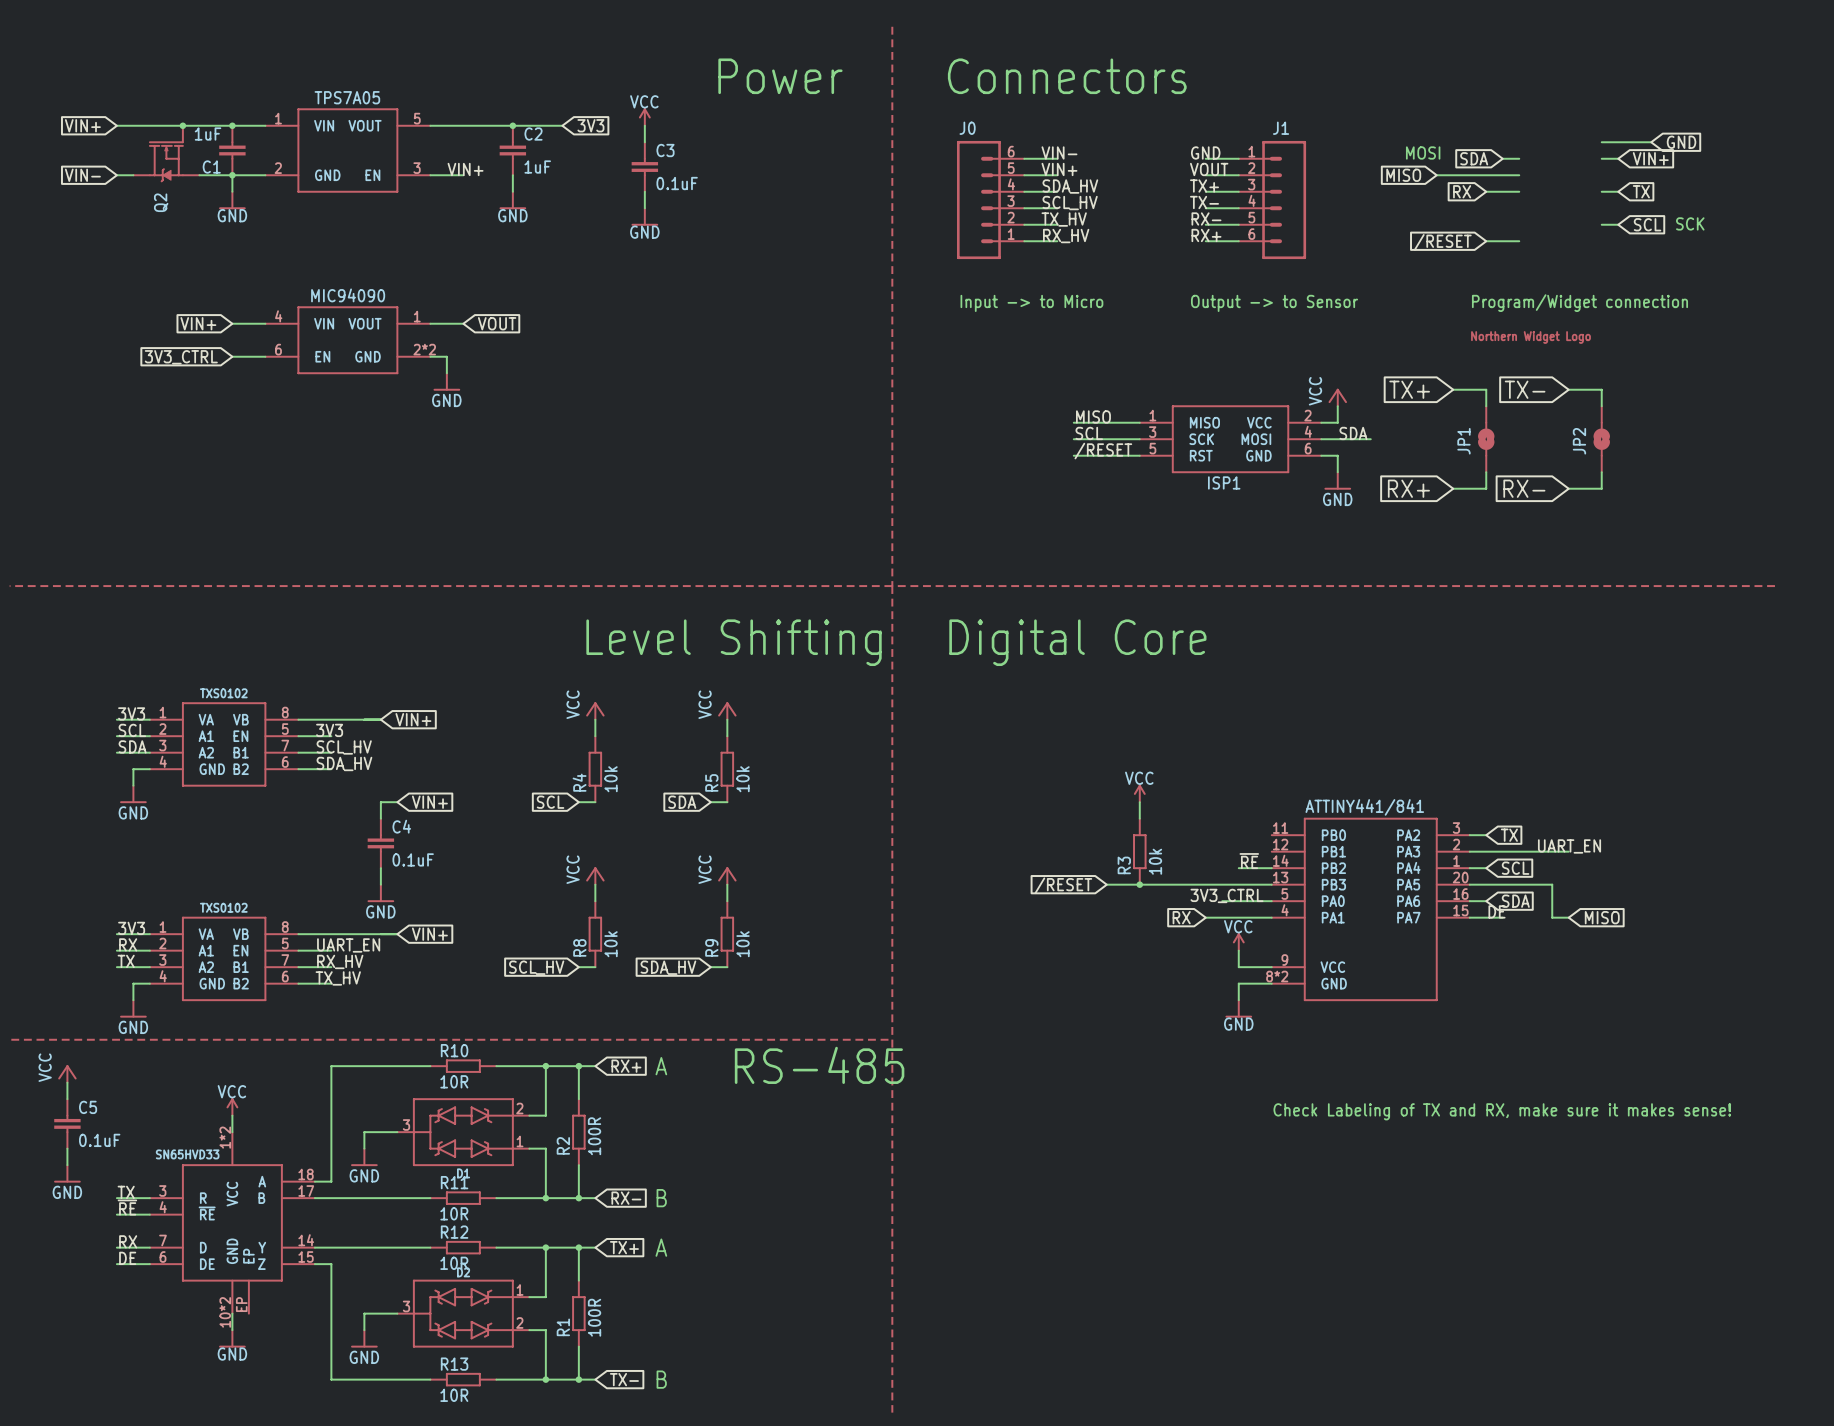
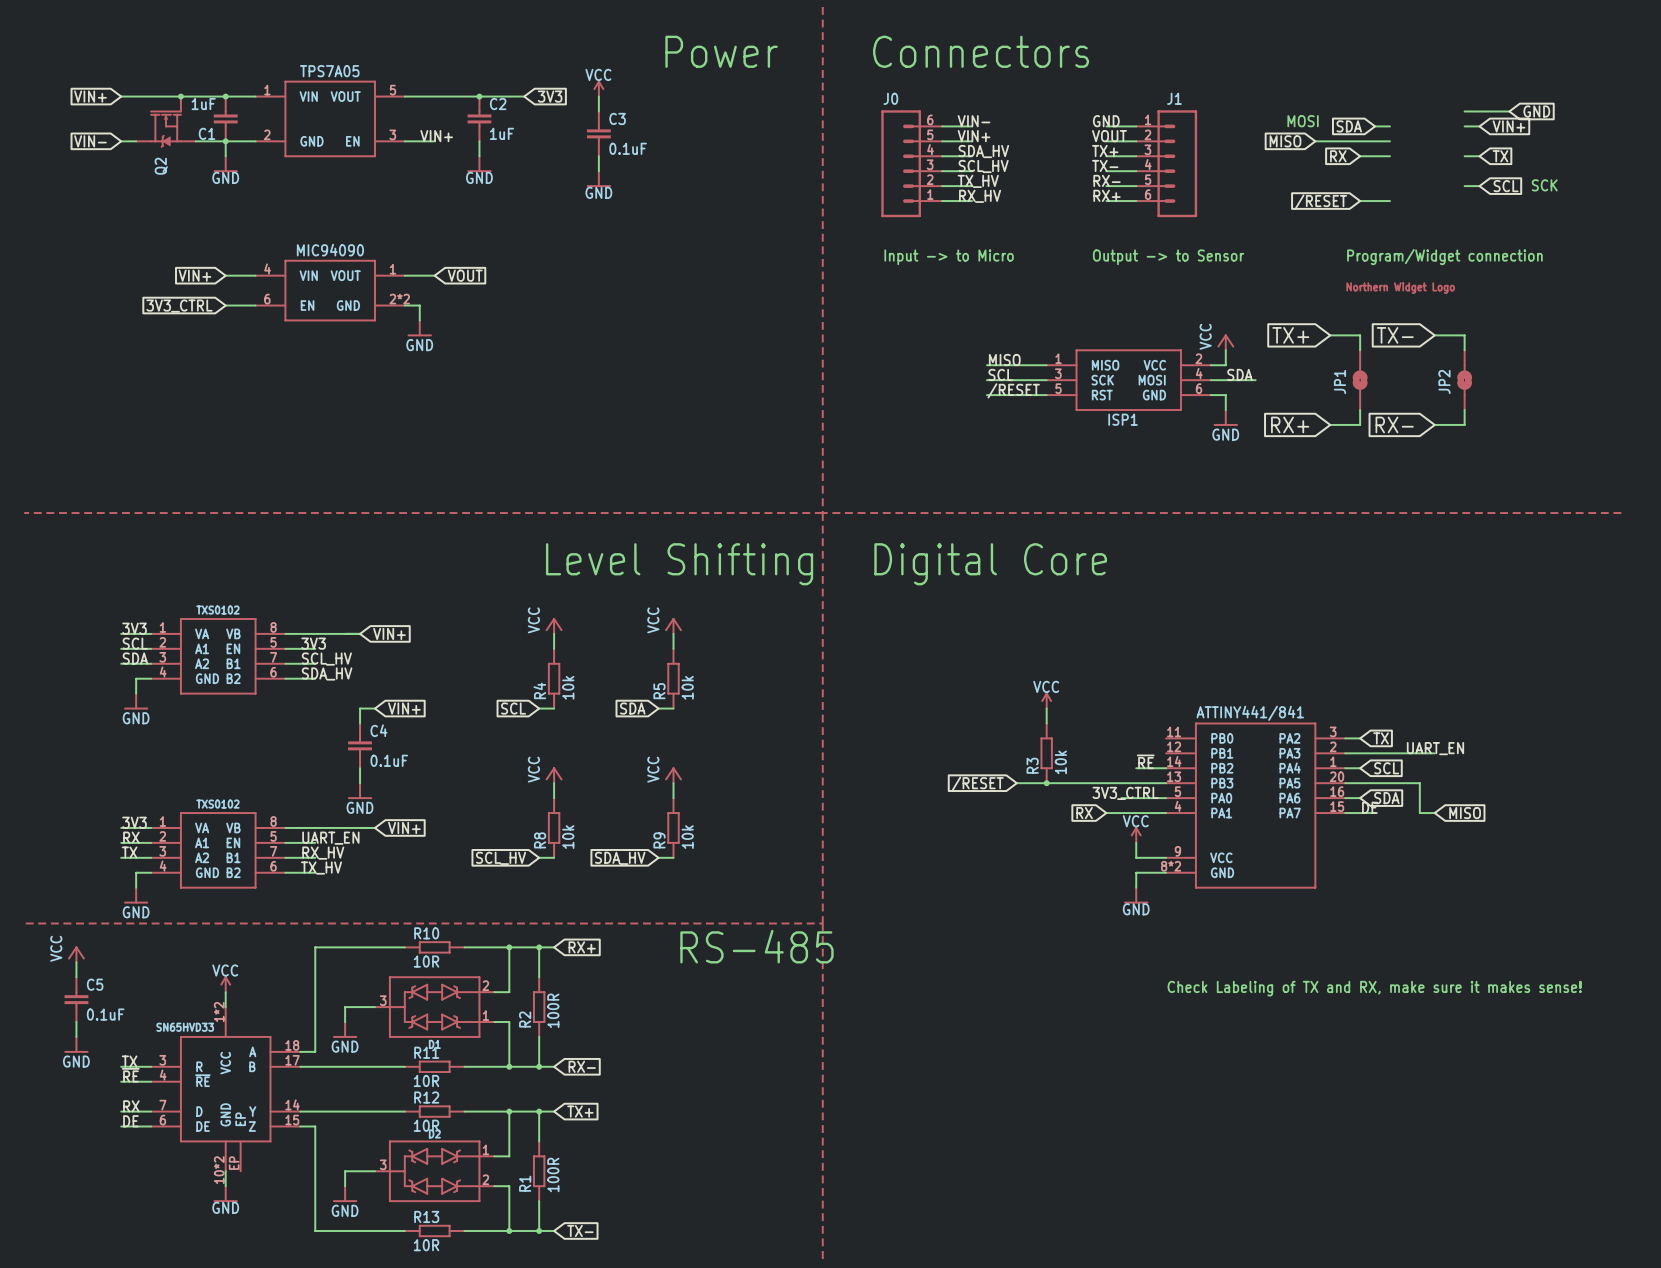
text: A (661, 1066) -> none
text: B (661, 1198) -> none
text: A (661, 1247) -> none
text: B (661, 1379) -> none

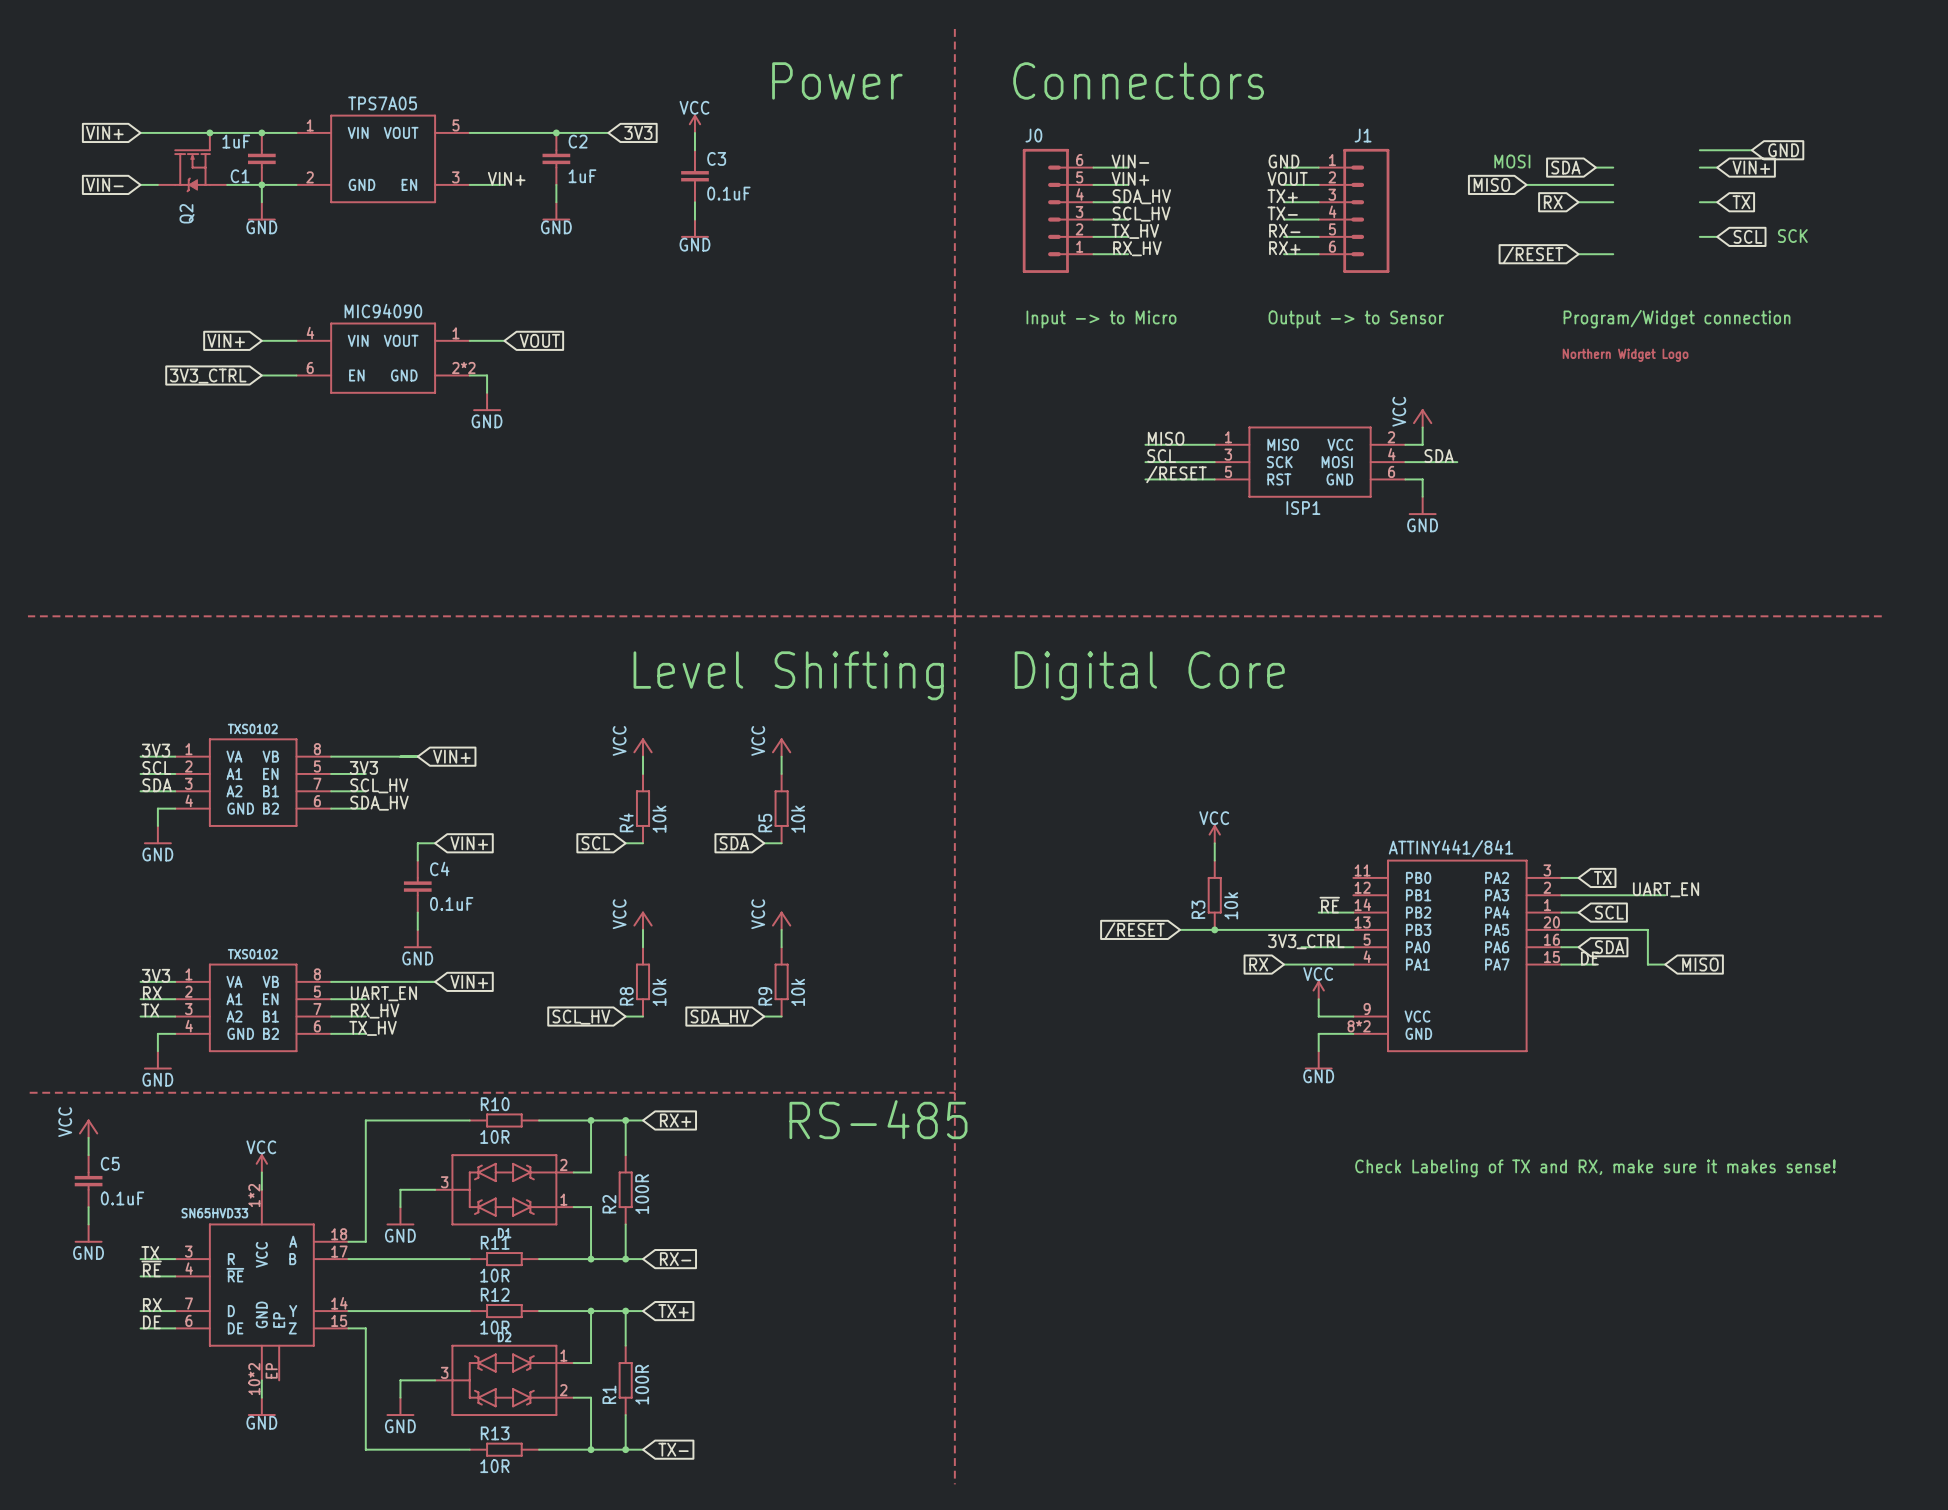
global label: TX+ (1290, 335) -> none
wire: (1330, 335) (1360, 335) (1360, 350) -> none
global label: TX- (1395, 335) -> none
wire: (1434, 335) (1464, 335) (1464, 350) -> none
JP1: (1360, 380) -> none
JP2: (1464, 380) -> none
wire: (1360, 410) (1360, 424) (1330, 424) -> none
wire: (1464, 410) (1464, 424) (1434, 424) -> none
global label: RX+ (1290, 424) -> none
global label: RX- (1394, 424) -> none

